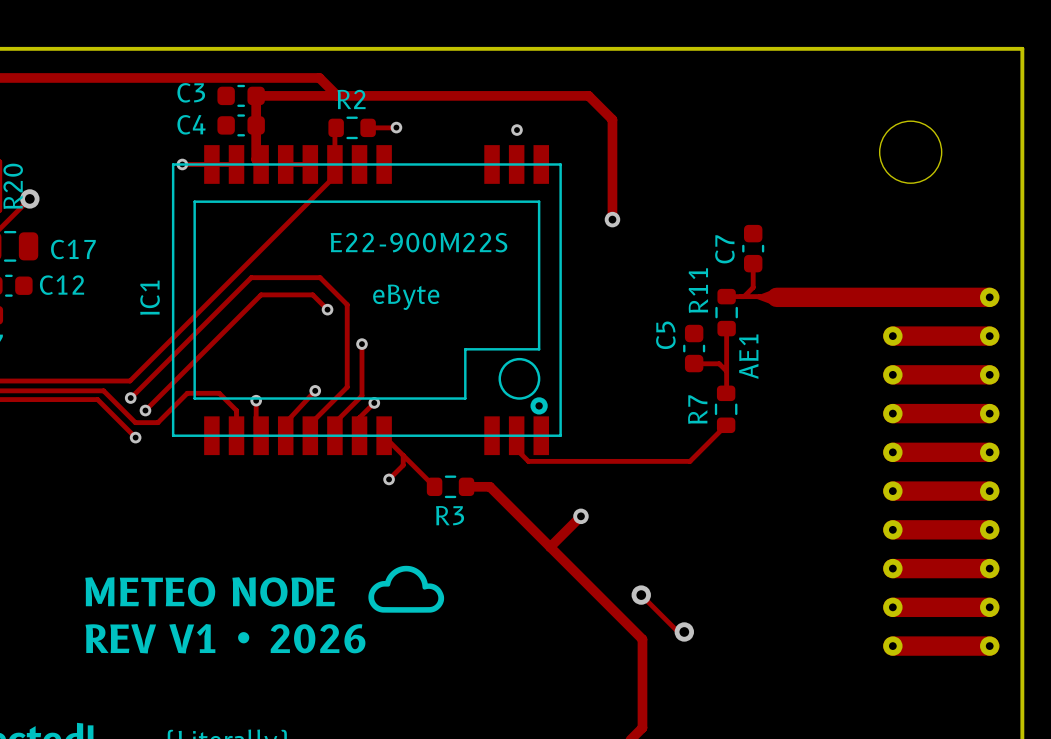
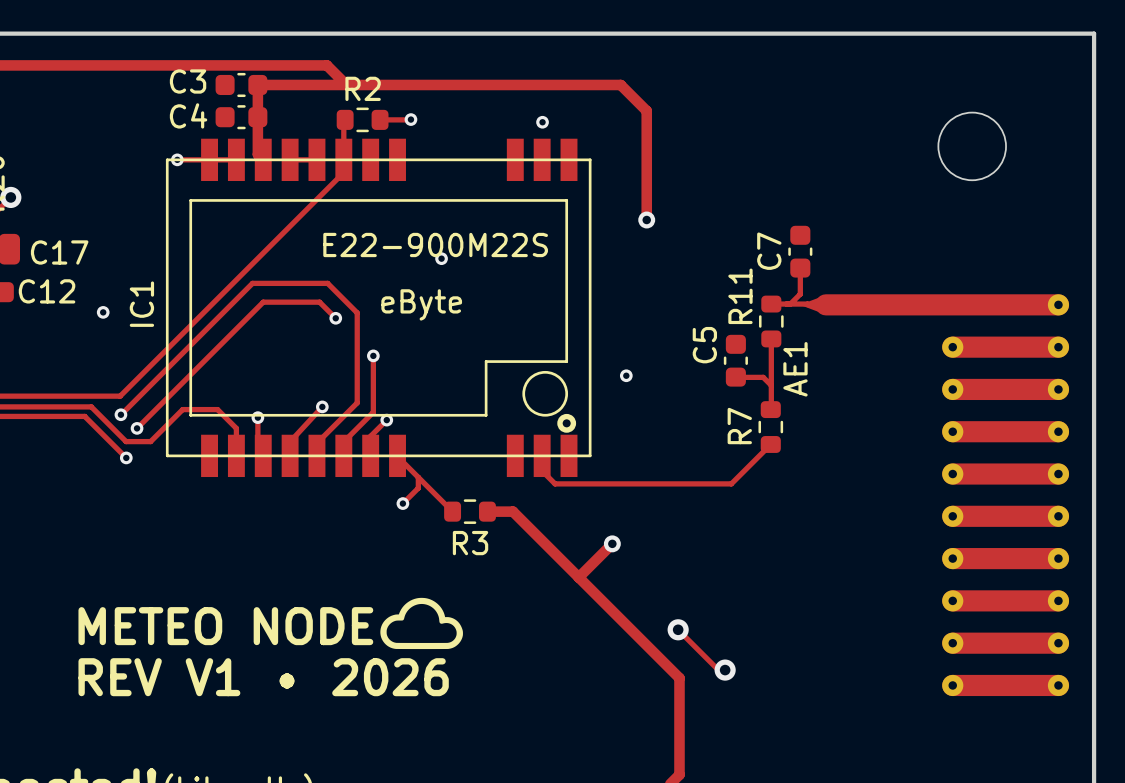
via: none -> (441, 258)
via: none -> (103, 312)
via: none -> (626, 375)

